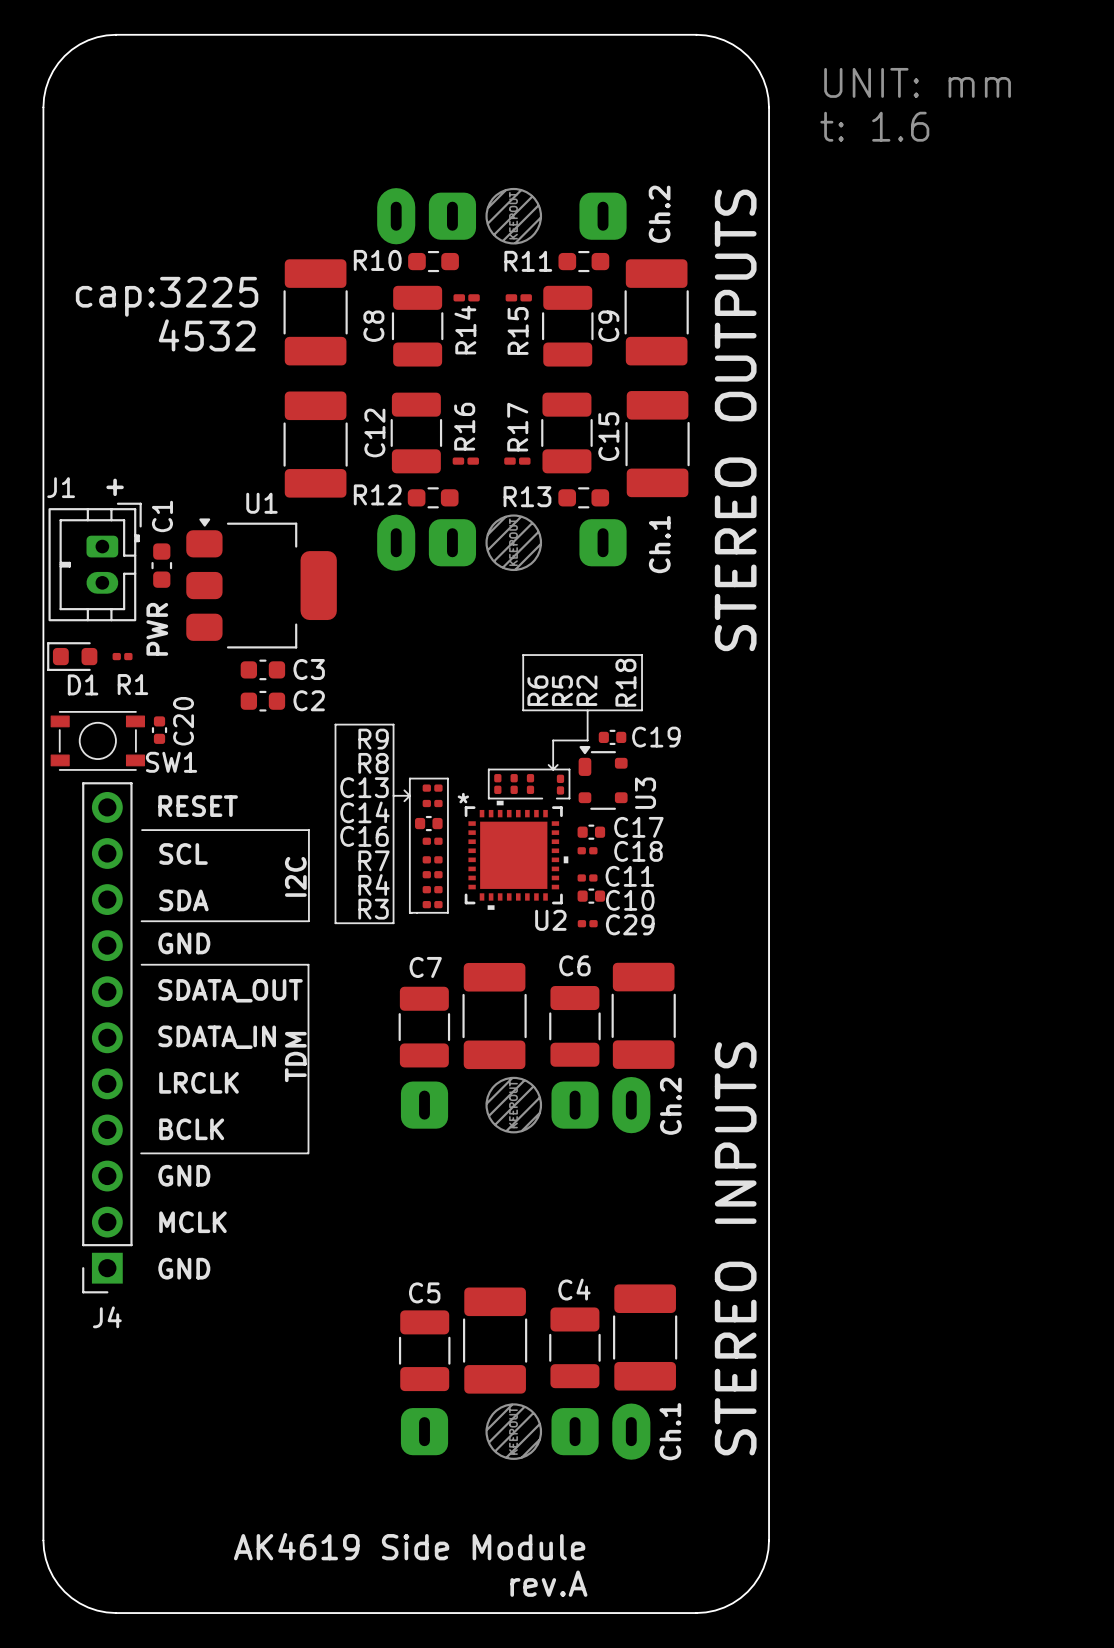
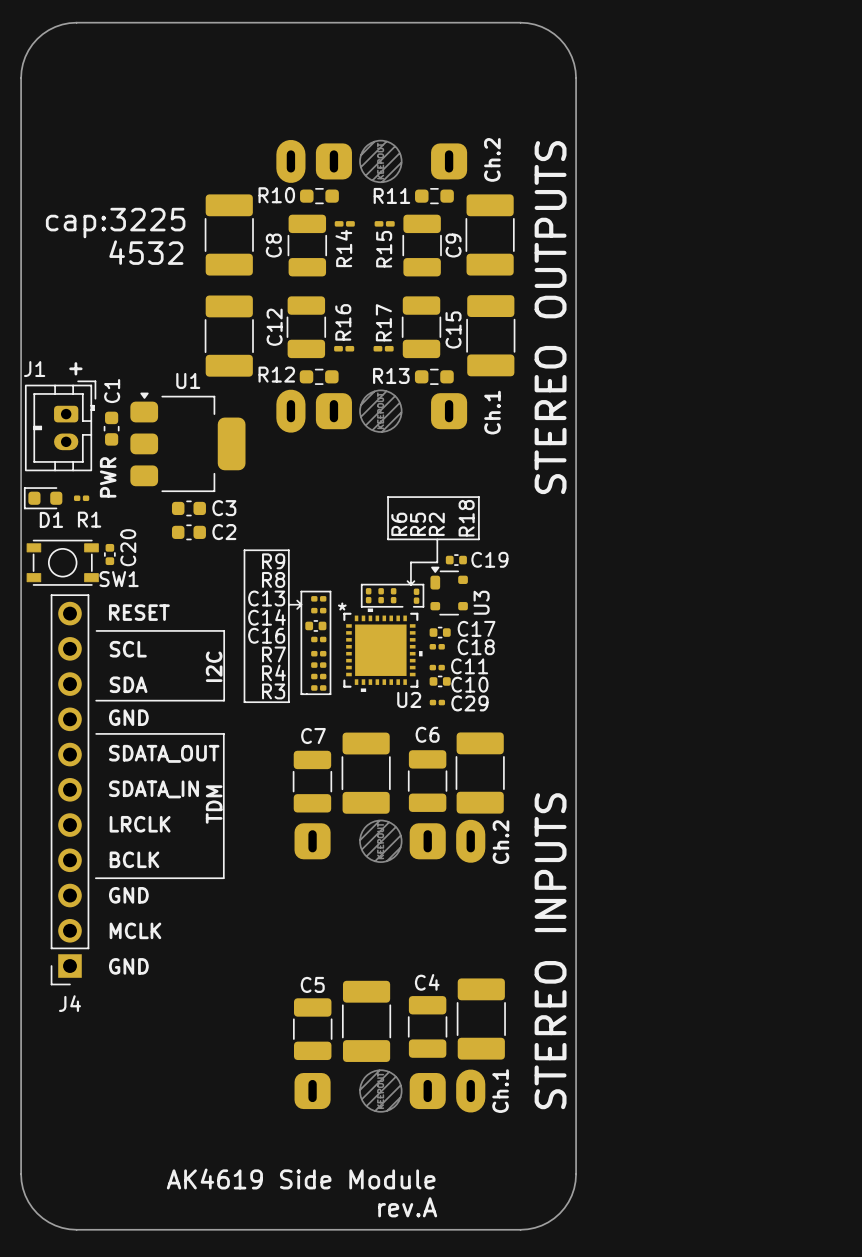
text: UNIT: mm (917, 82) -> none
text: t: 1.6 (874, 126) -> none

